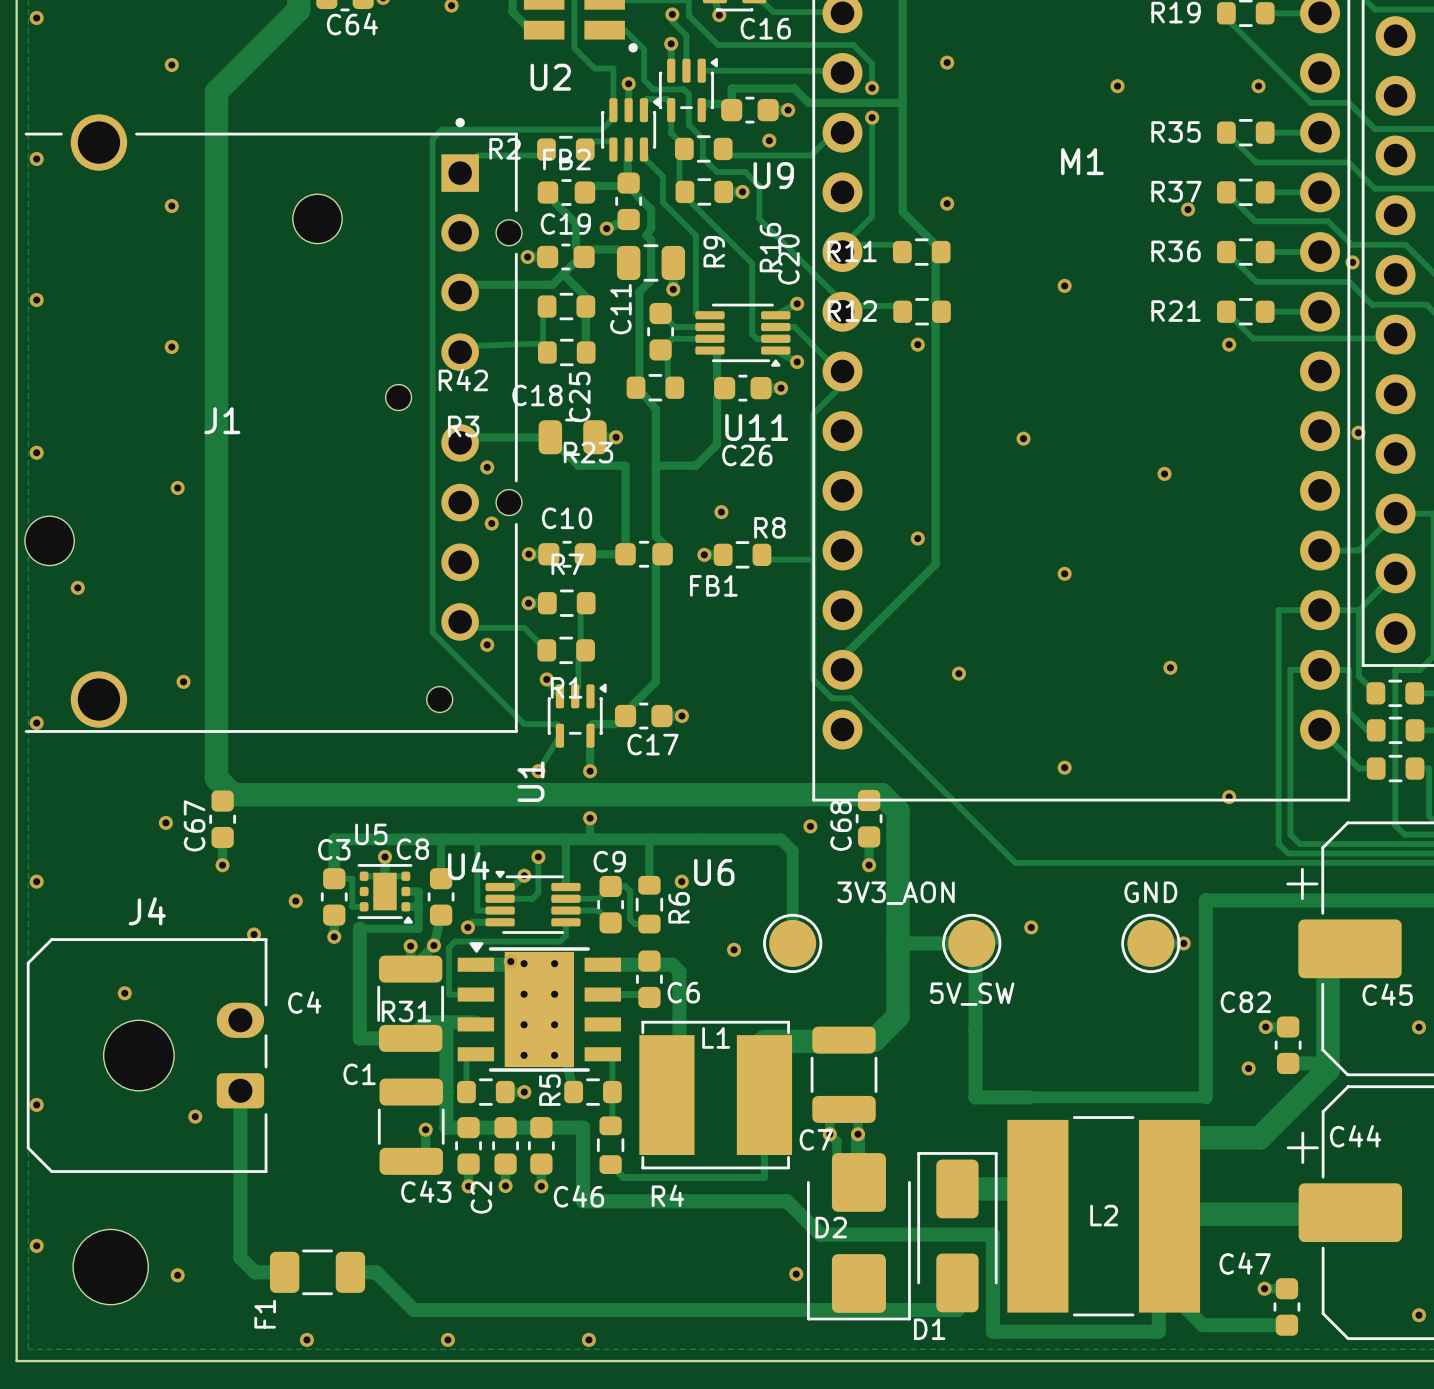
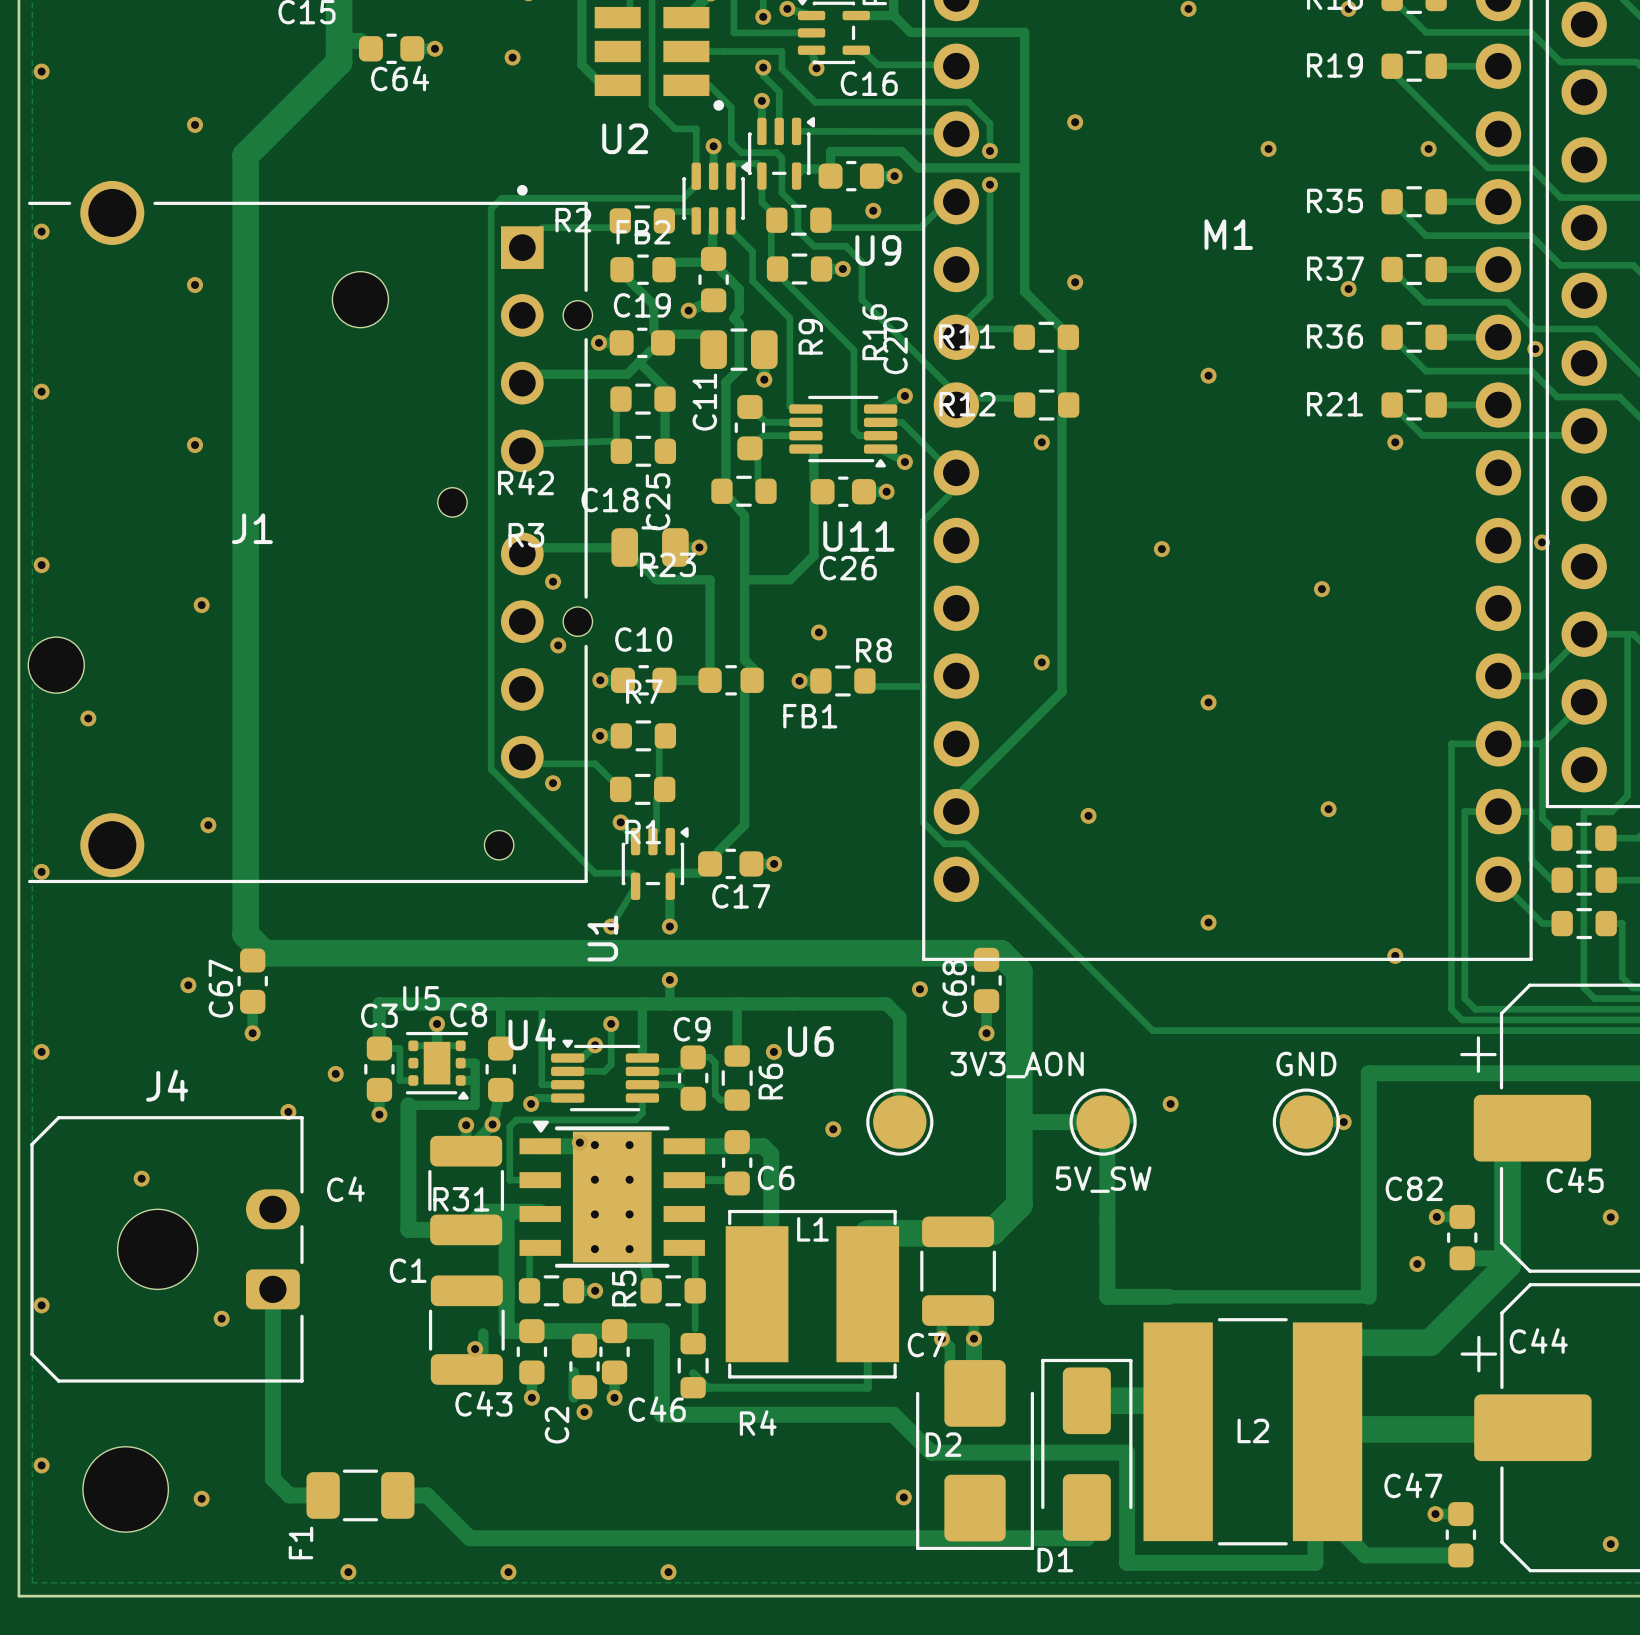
via position: (425, 1129) -> (475, 1349)
C2 position: (505, 1145) -> (584, 1366)
R4 position: (610, 1145) -> (693, 1365)
via position: (505, 1185) -> (584, 1412)

